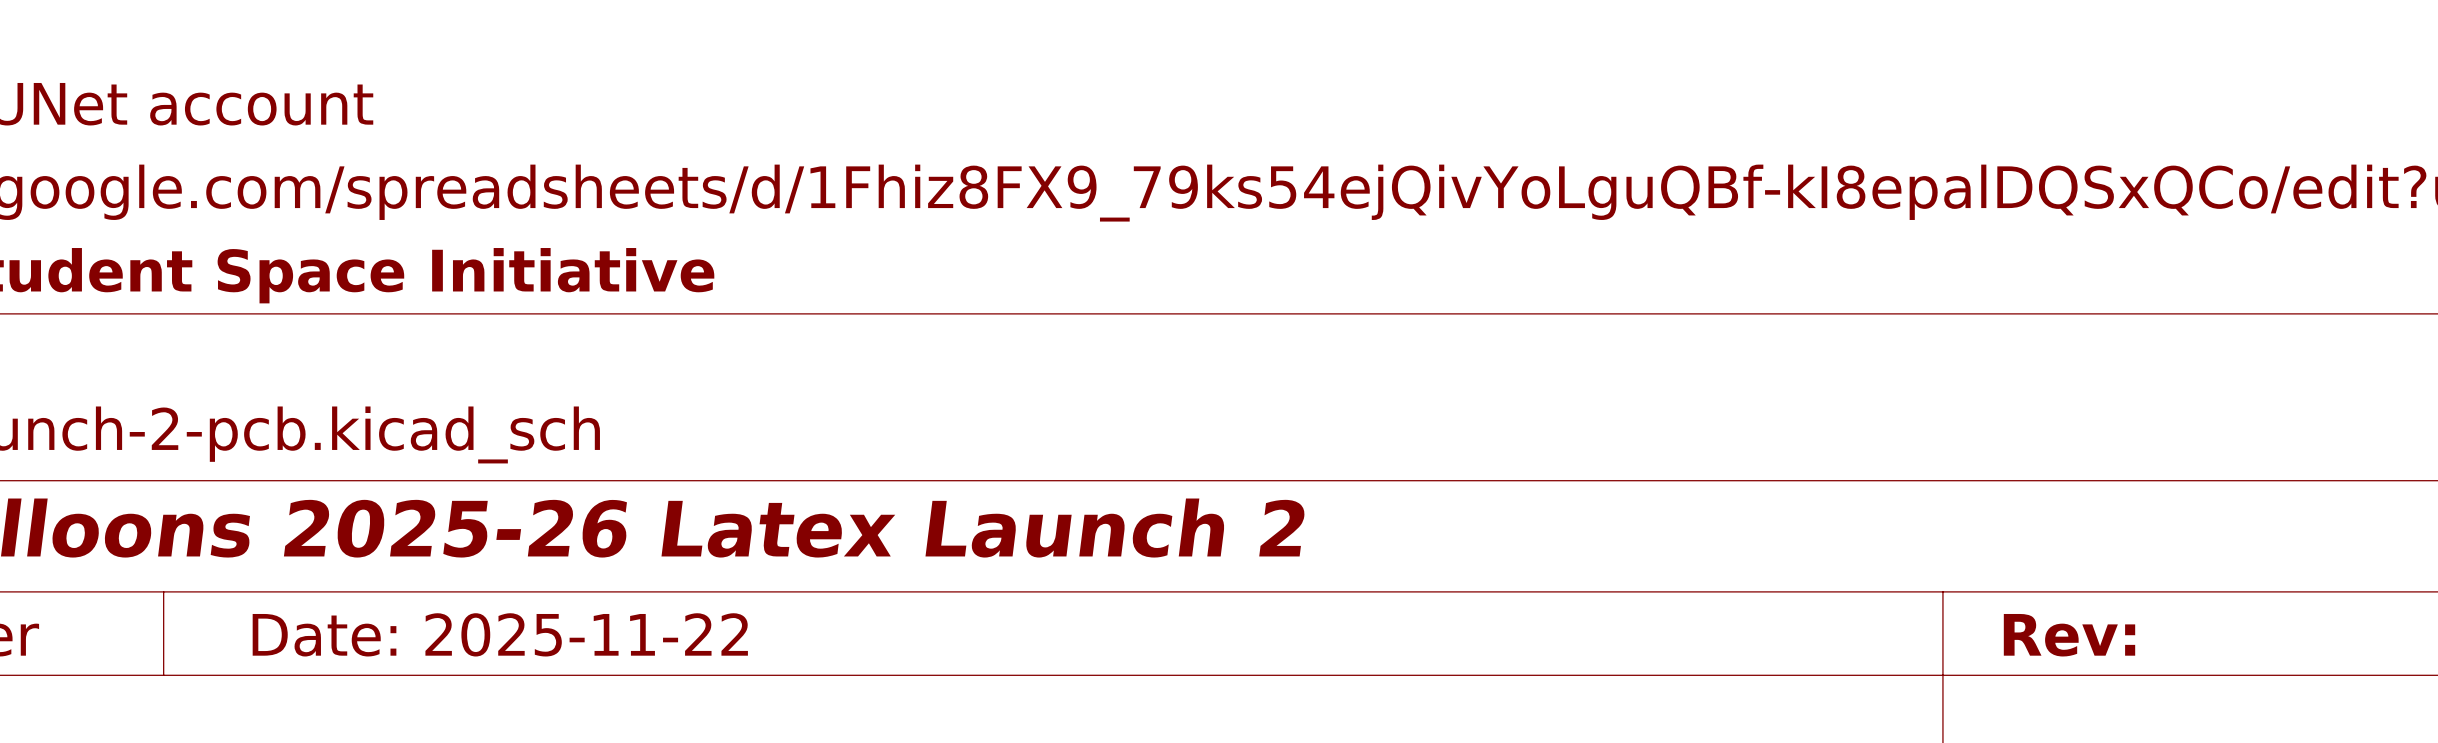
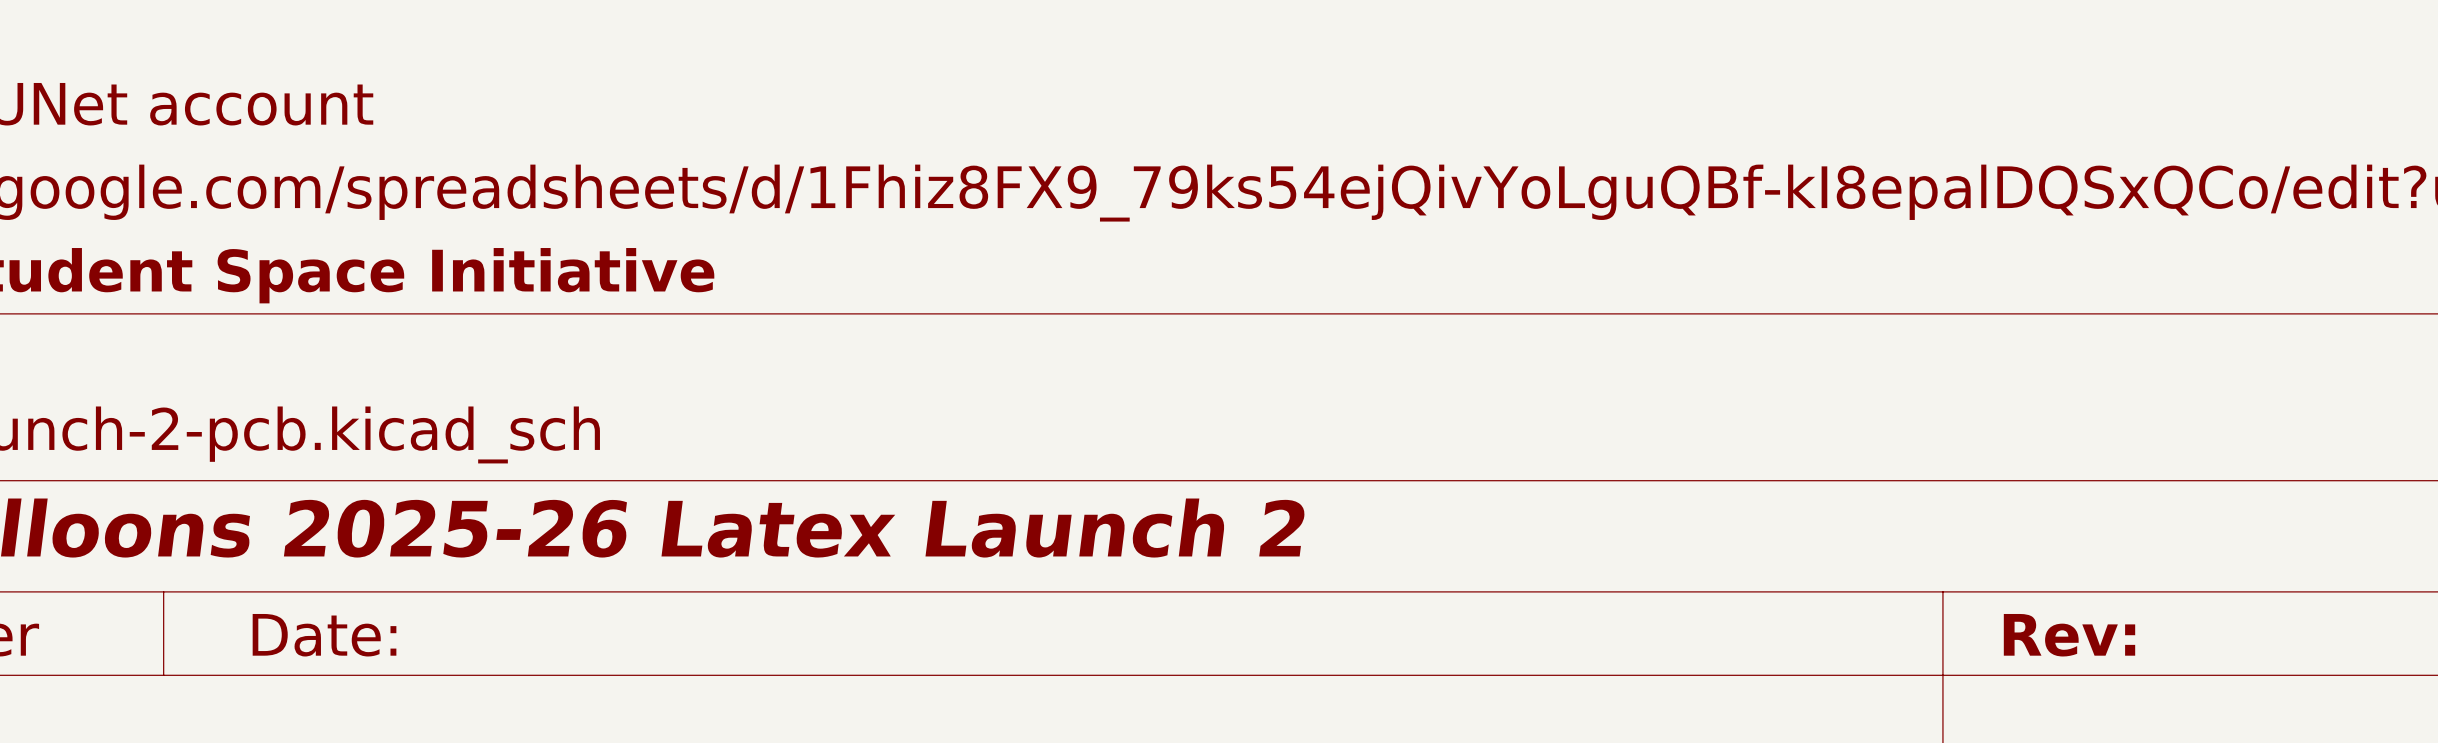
title block: Date: 2025-11-22 (500, 634) -> Date: (324, 635)

